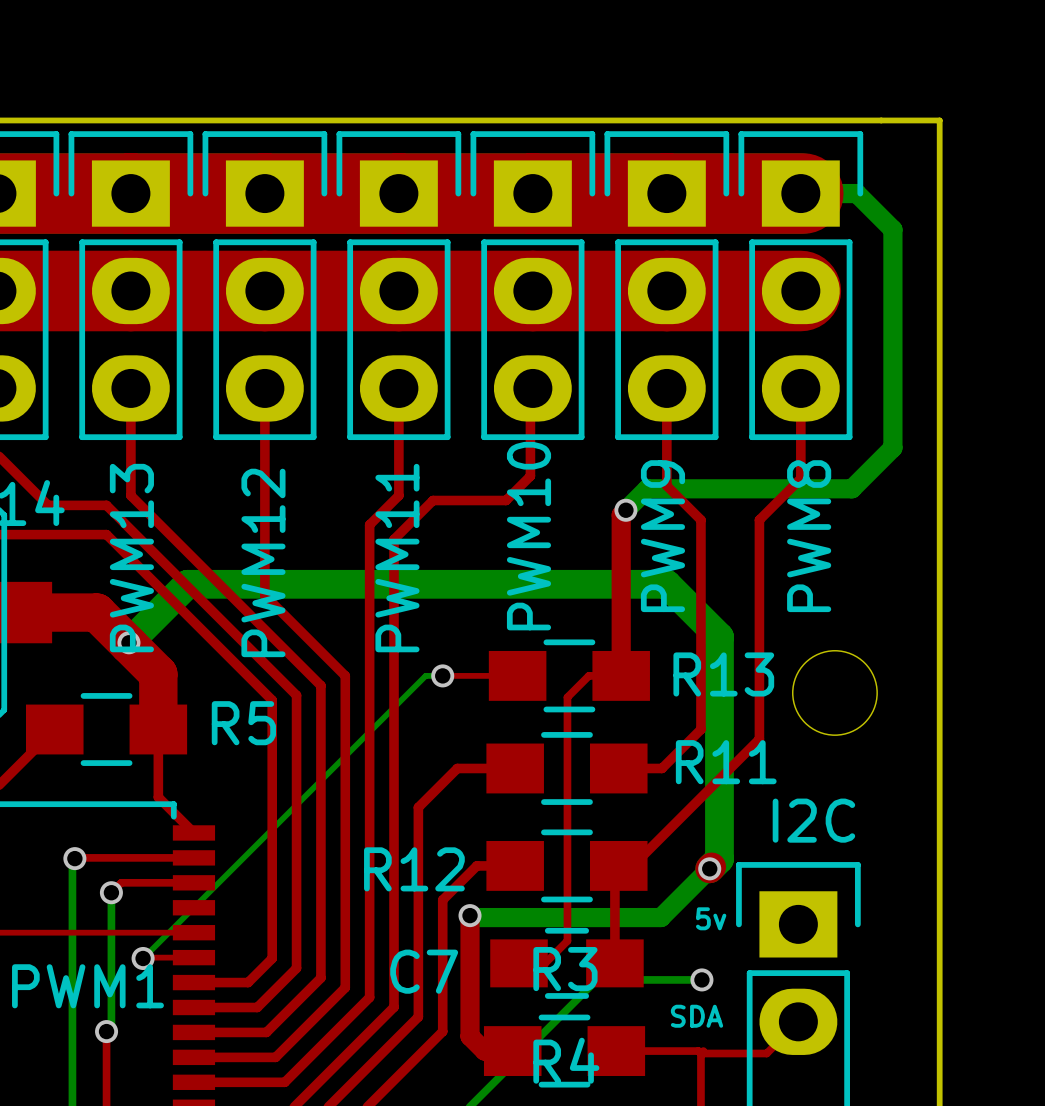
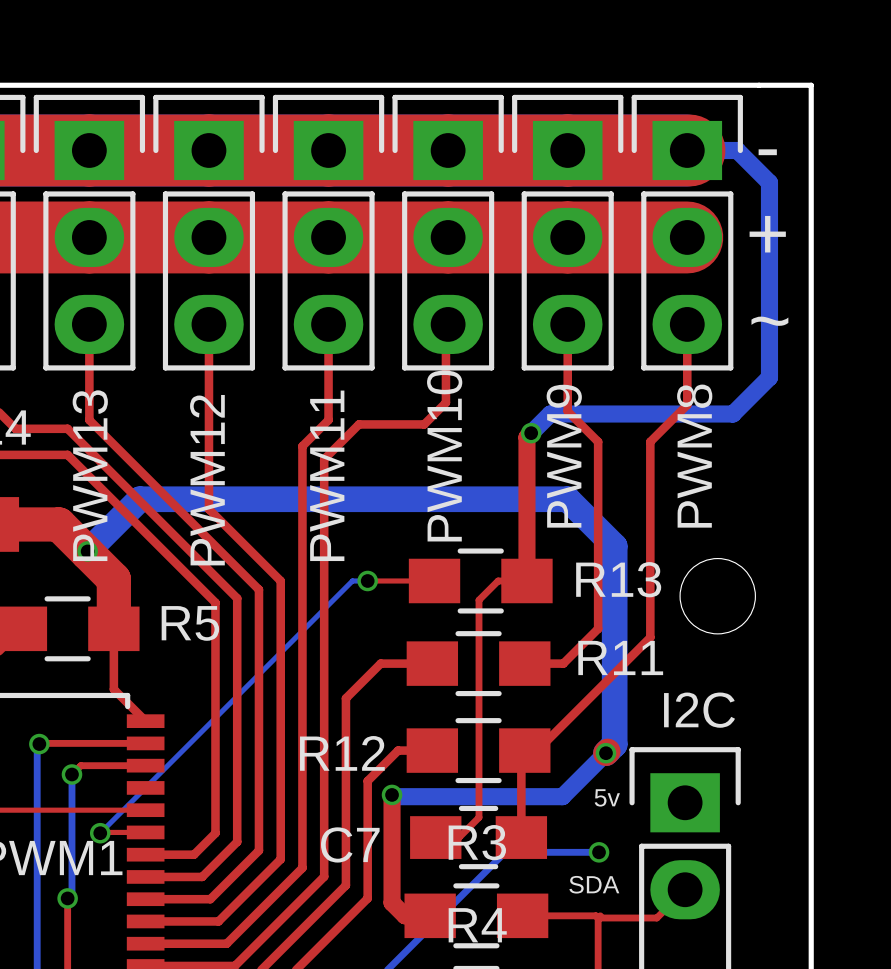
text: none -> - (767, 152)
text: none -> + (767, 234)
text: none -> ~ (769, 321)

